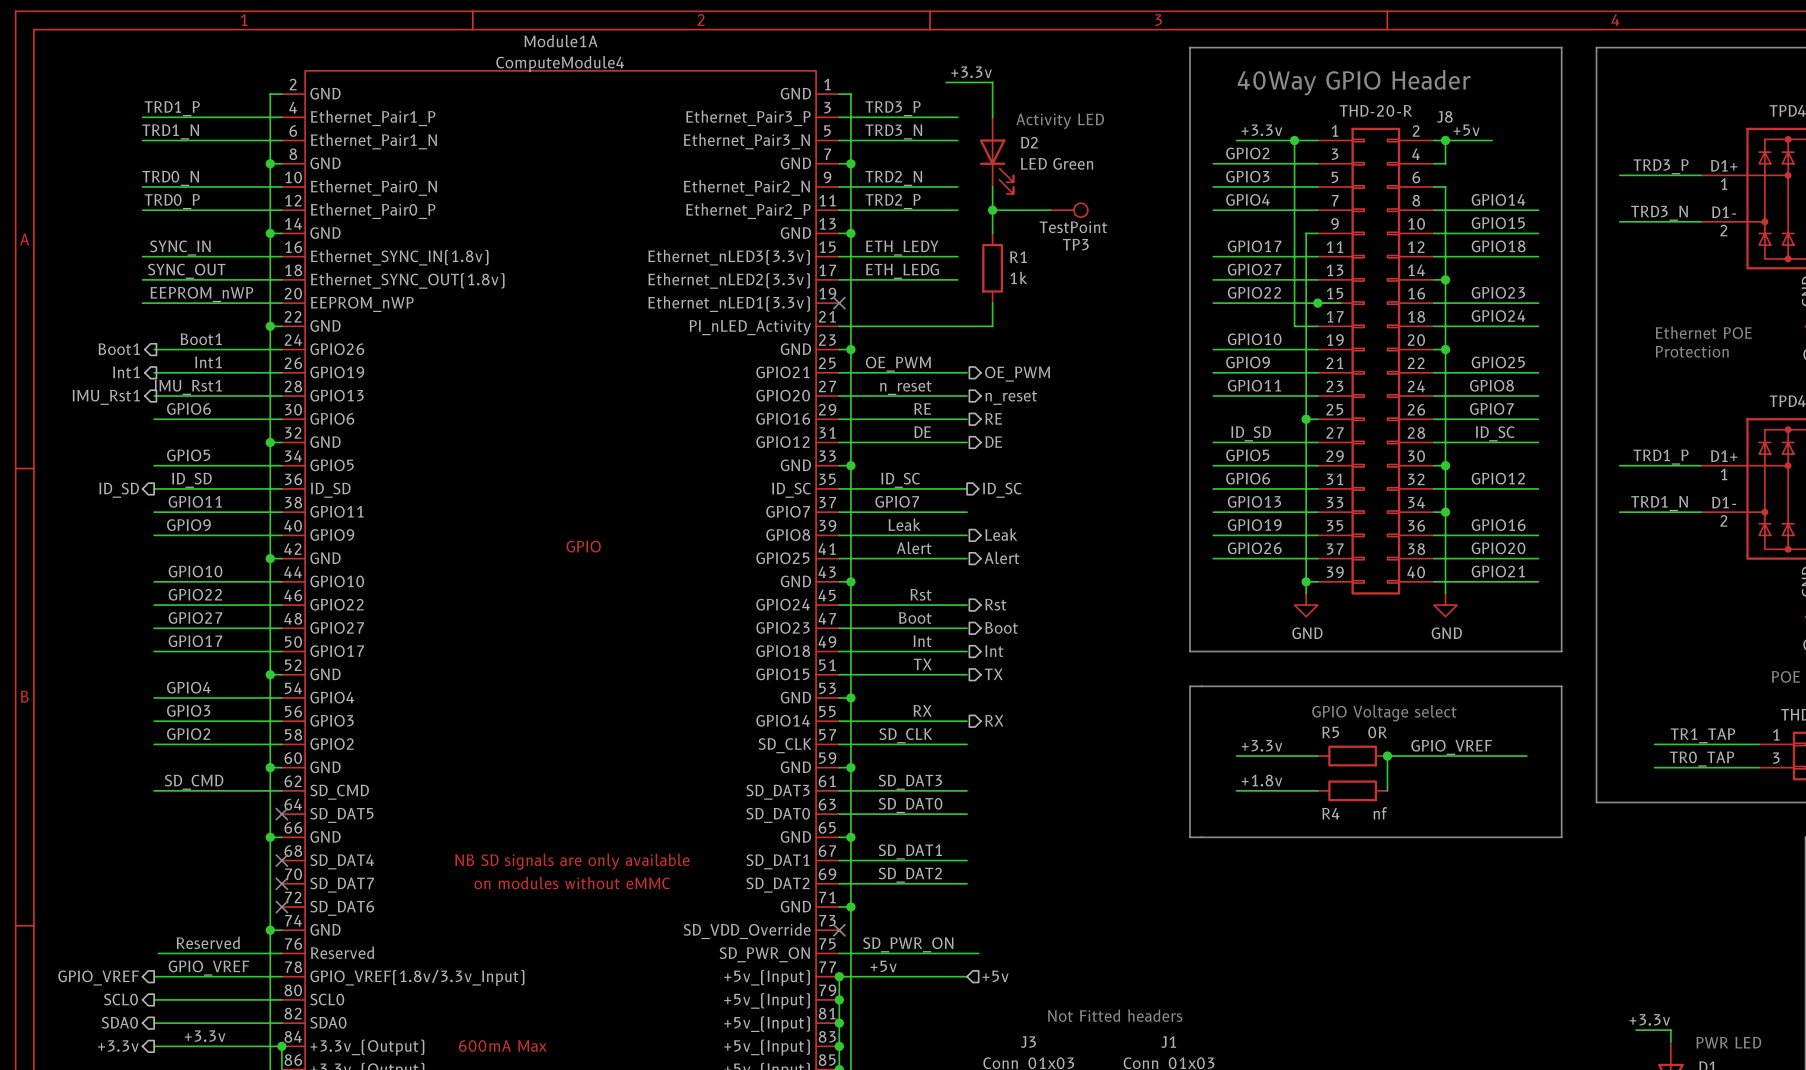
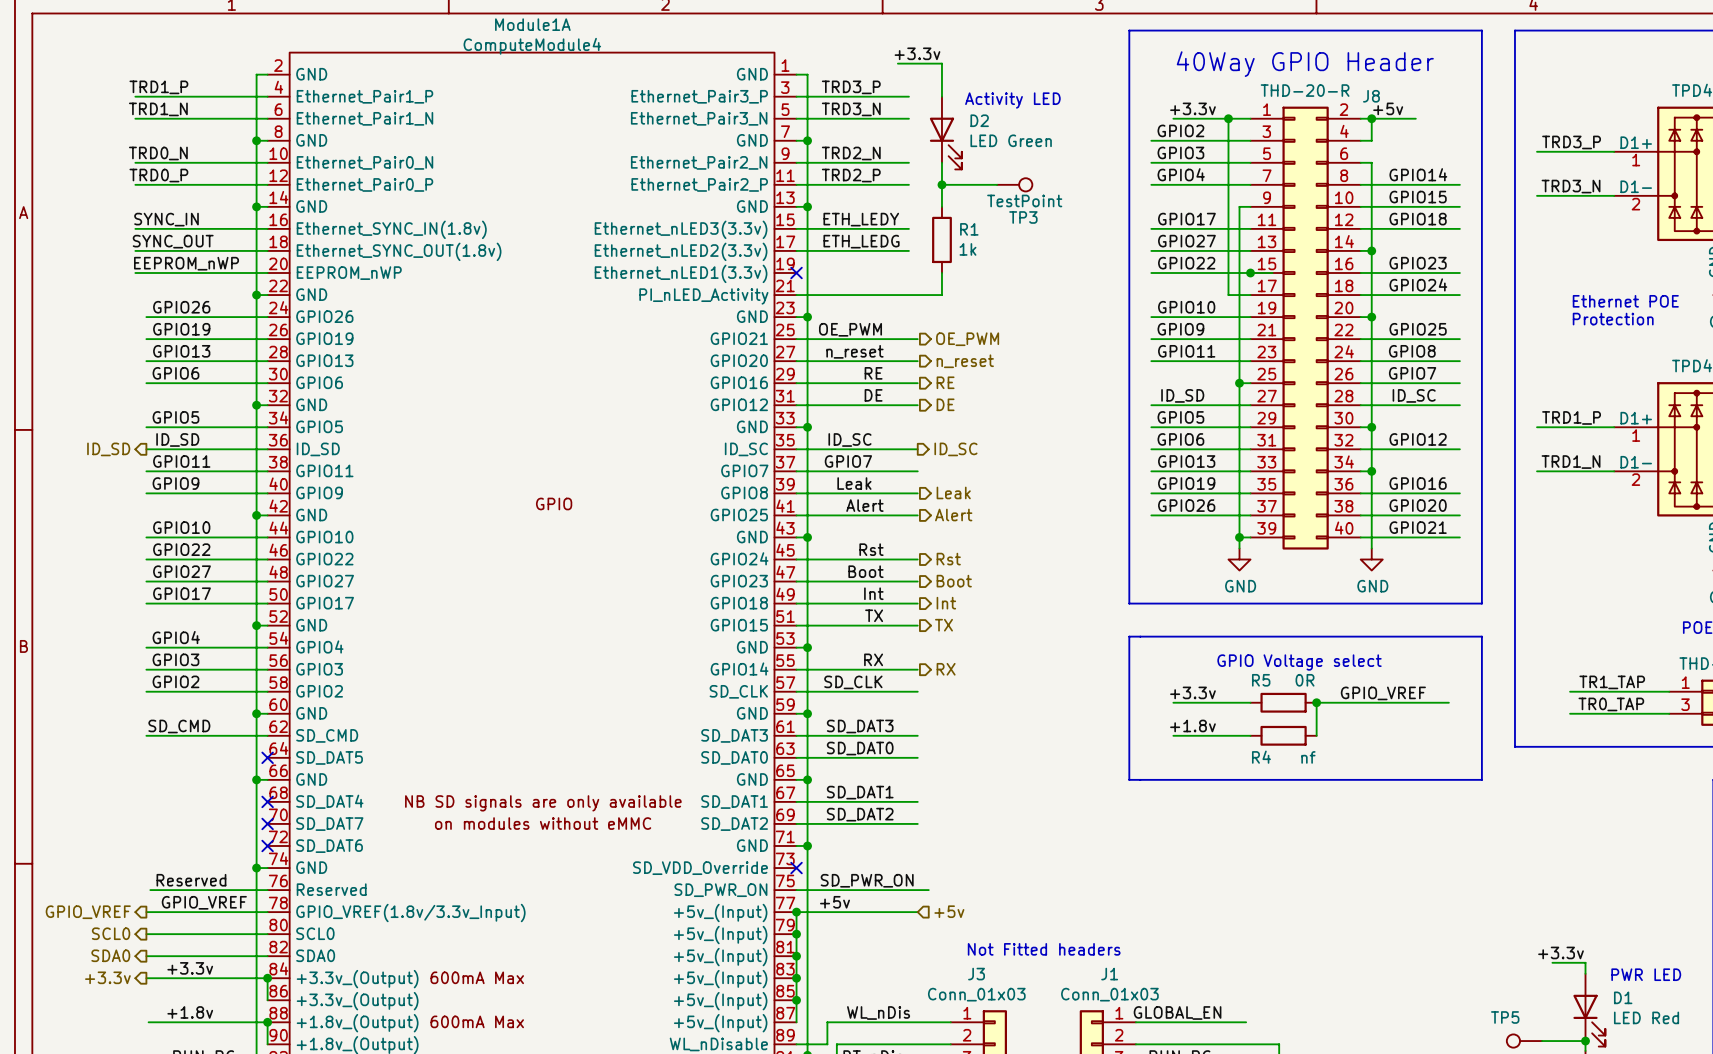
label: Boot1 (201, 339) -> GPIO26 (181, 307)
hierarchical label: Boot1 (119, 349) -> none
label: Int1 (208, 362) -> GPIO19 (181, 329)
hierarchical label: Int1 (126, 372) -> none
label: IMU_Rst1 (188, 387) -> GPIO13 (181, 351)
hierarchical label: IMU_Rst1 (106, 397) -> none

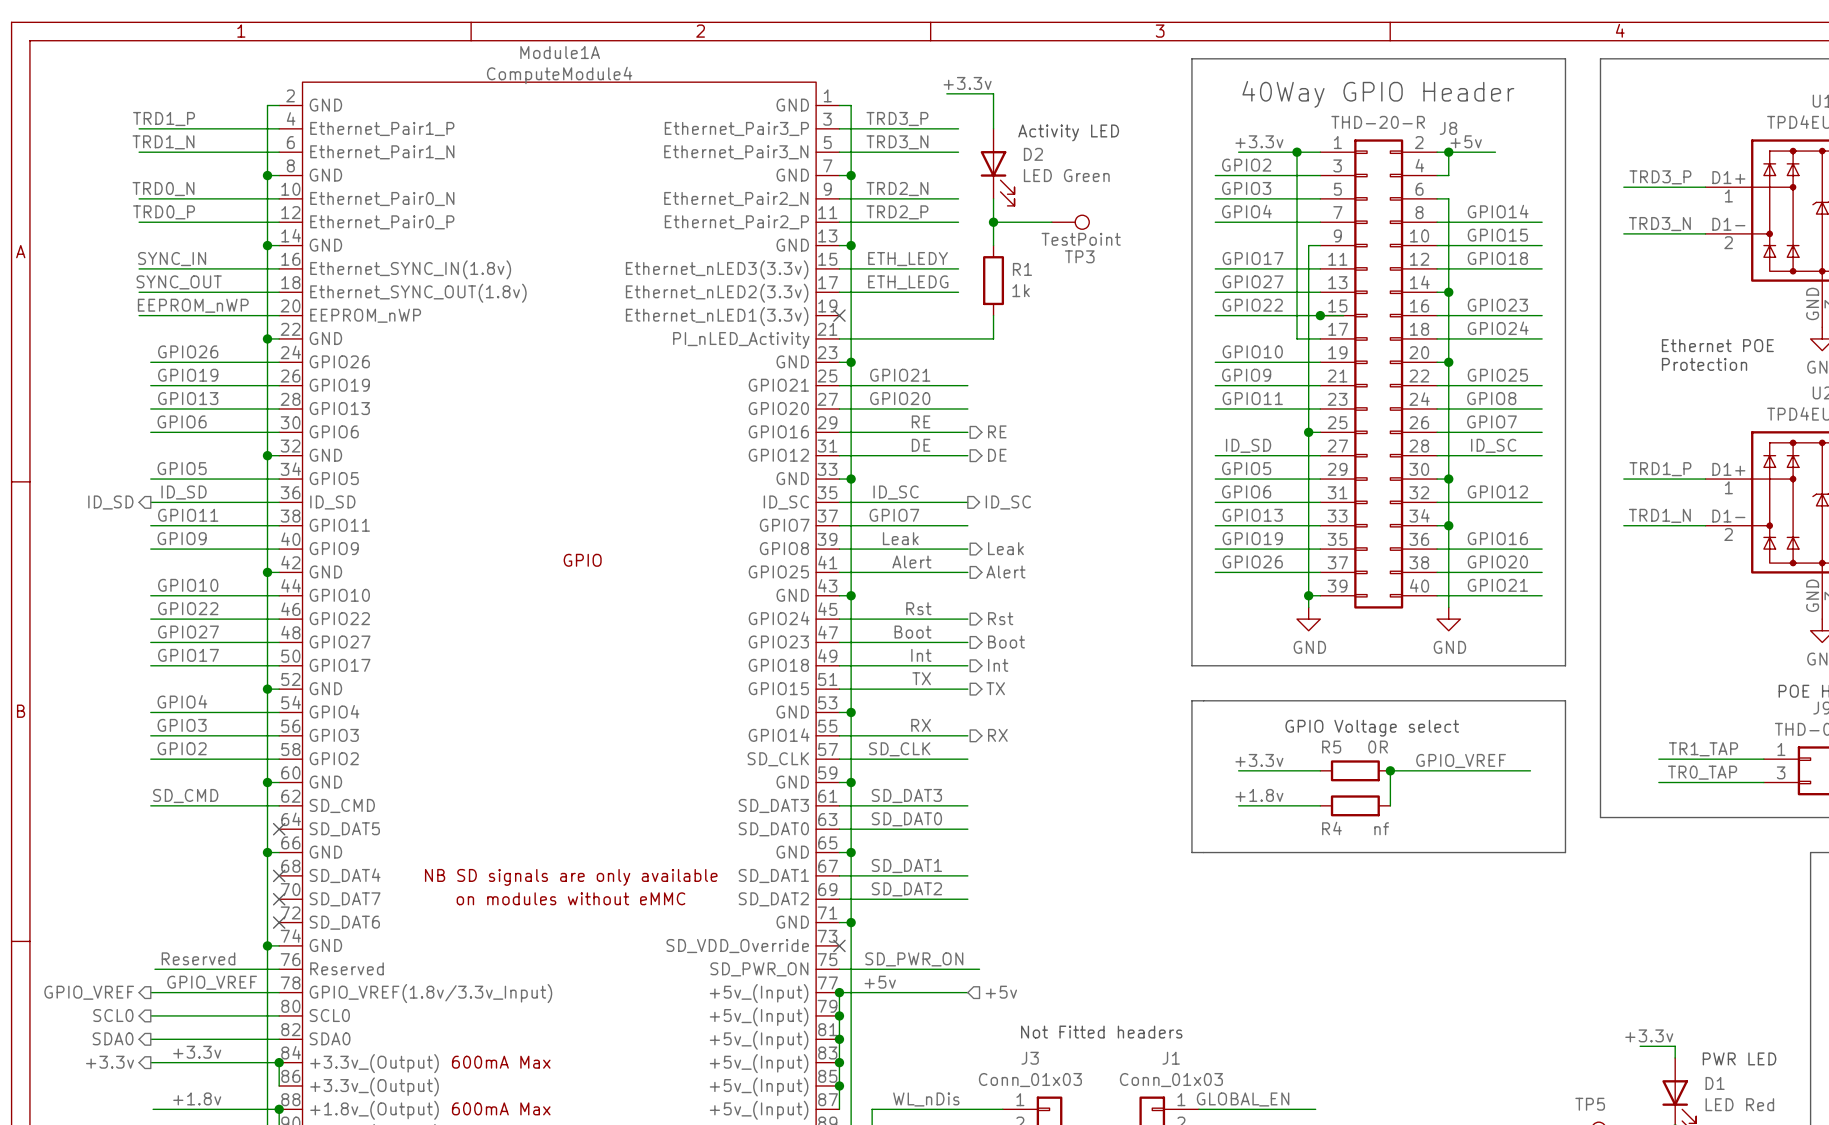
label: OE_PWM (850, 329) -> GPIO21 (900, 375)
hierarchical label: OE_PWM (967, 339) -> none
label: n_reset (854, 351) -> GPIO20 (900, 398)
hierarchical label: n_reset (965, 361) -> none

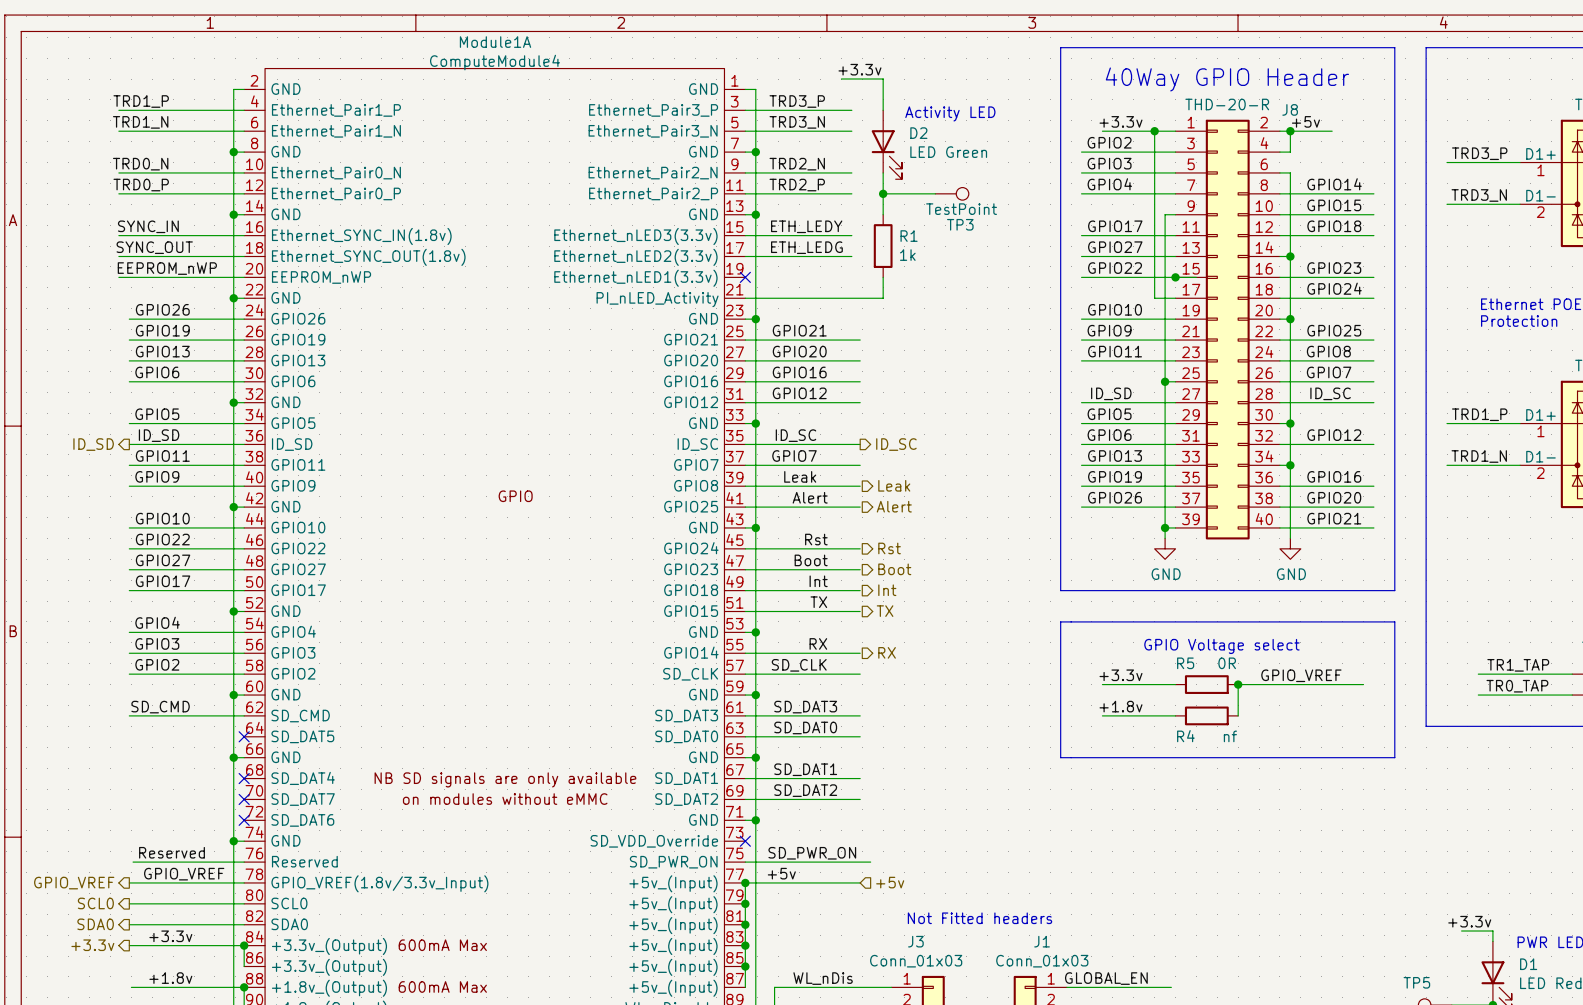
label: RE (921, 421) -> GPIO16 (799, 372)
hierarchical label: RE (997, 431) -> none
label: DE (921, 445) -> GPIO12 (799, 393)
hierarchical label: DE (997, 455) -> none

